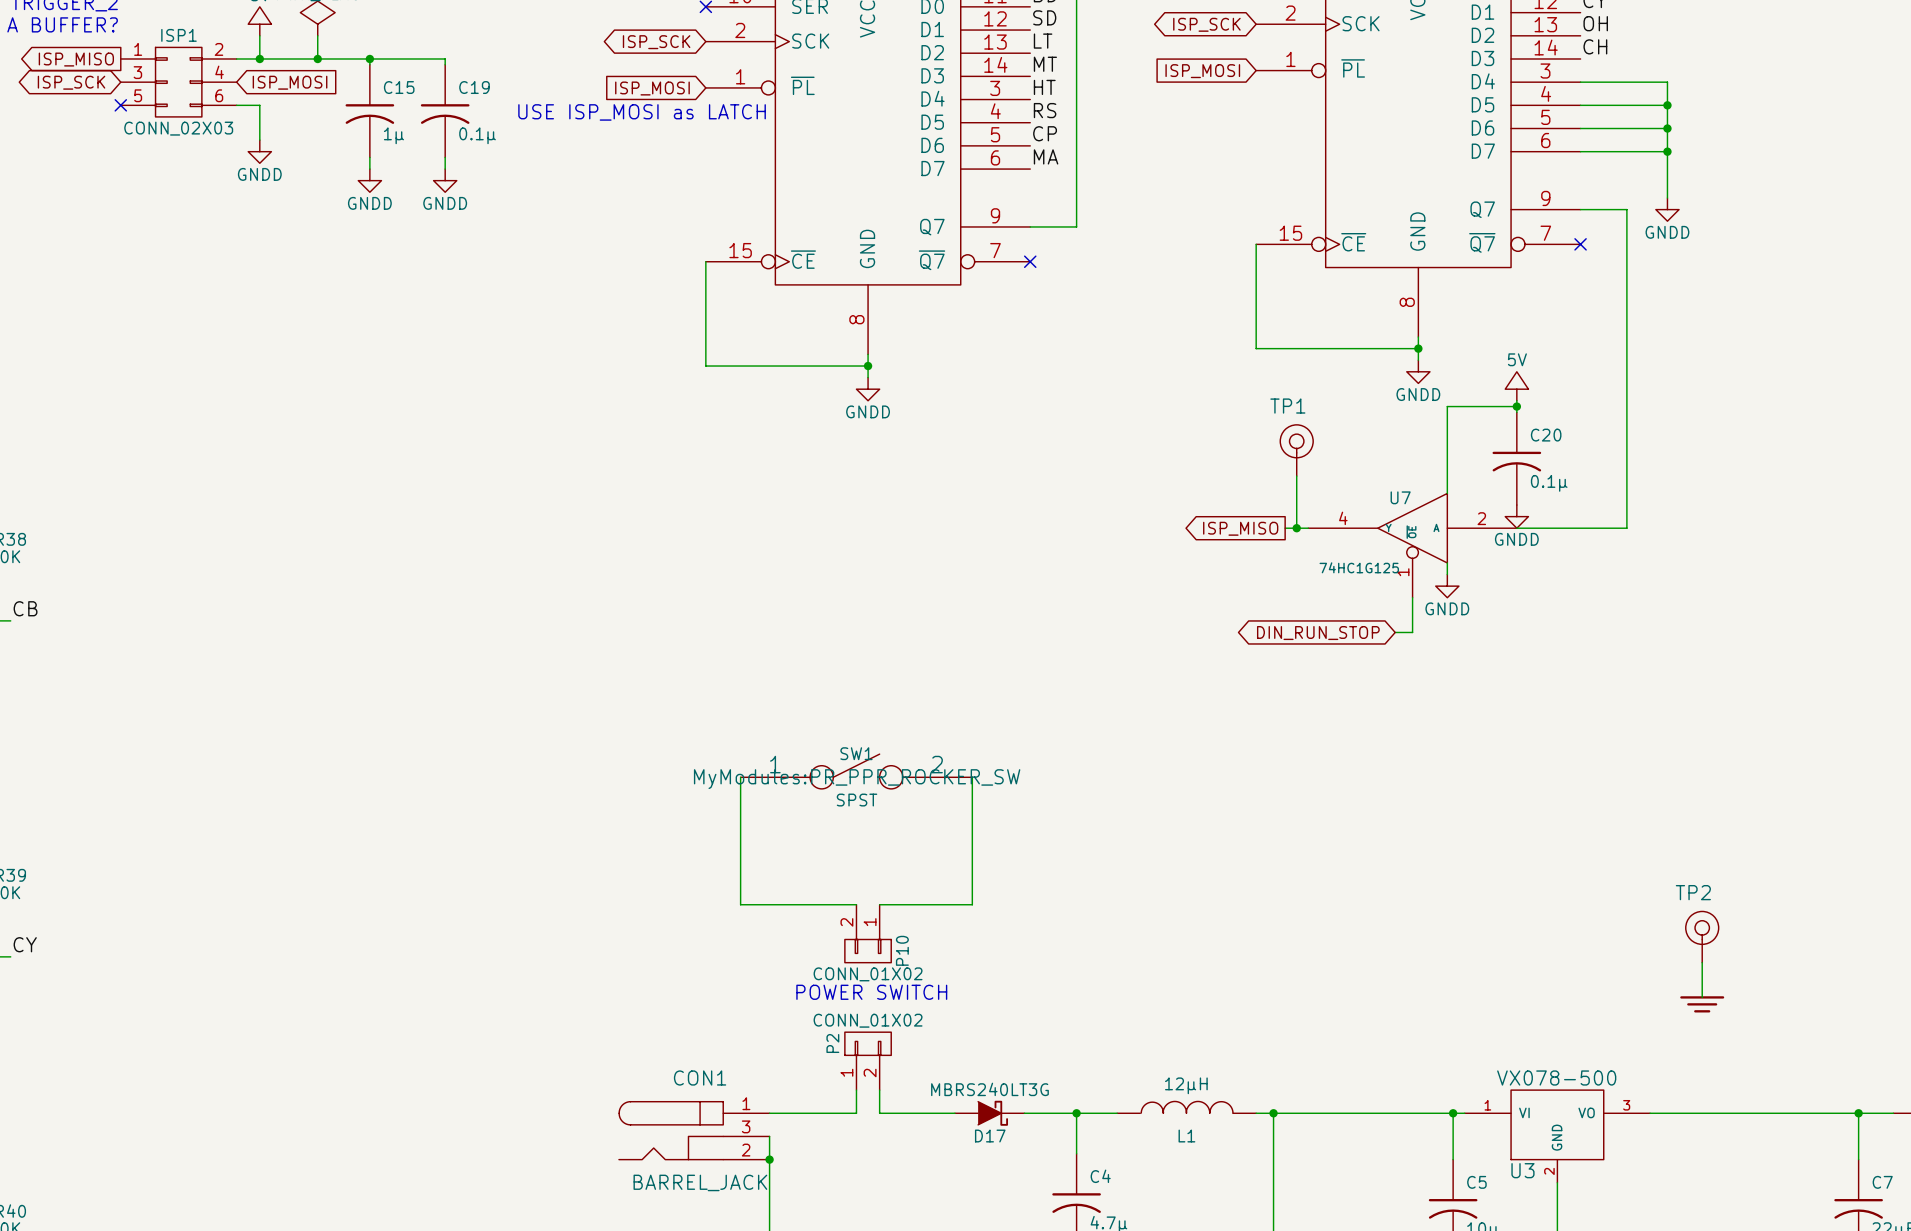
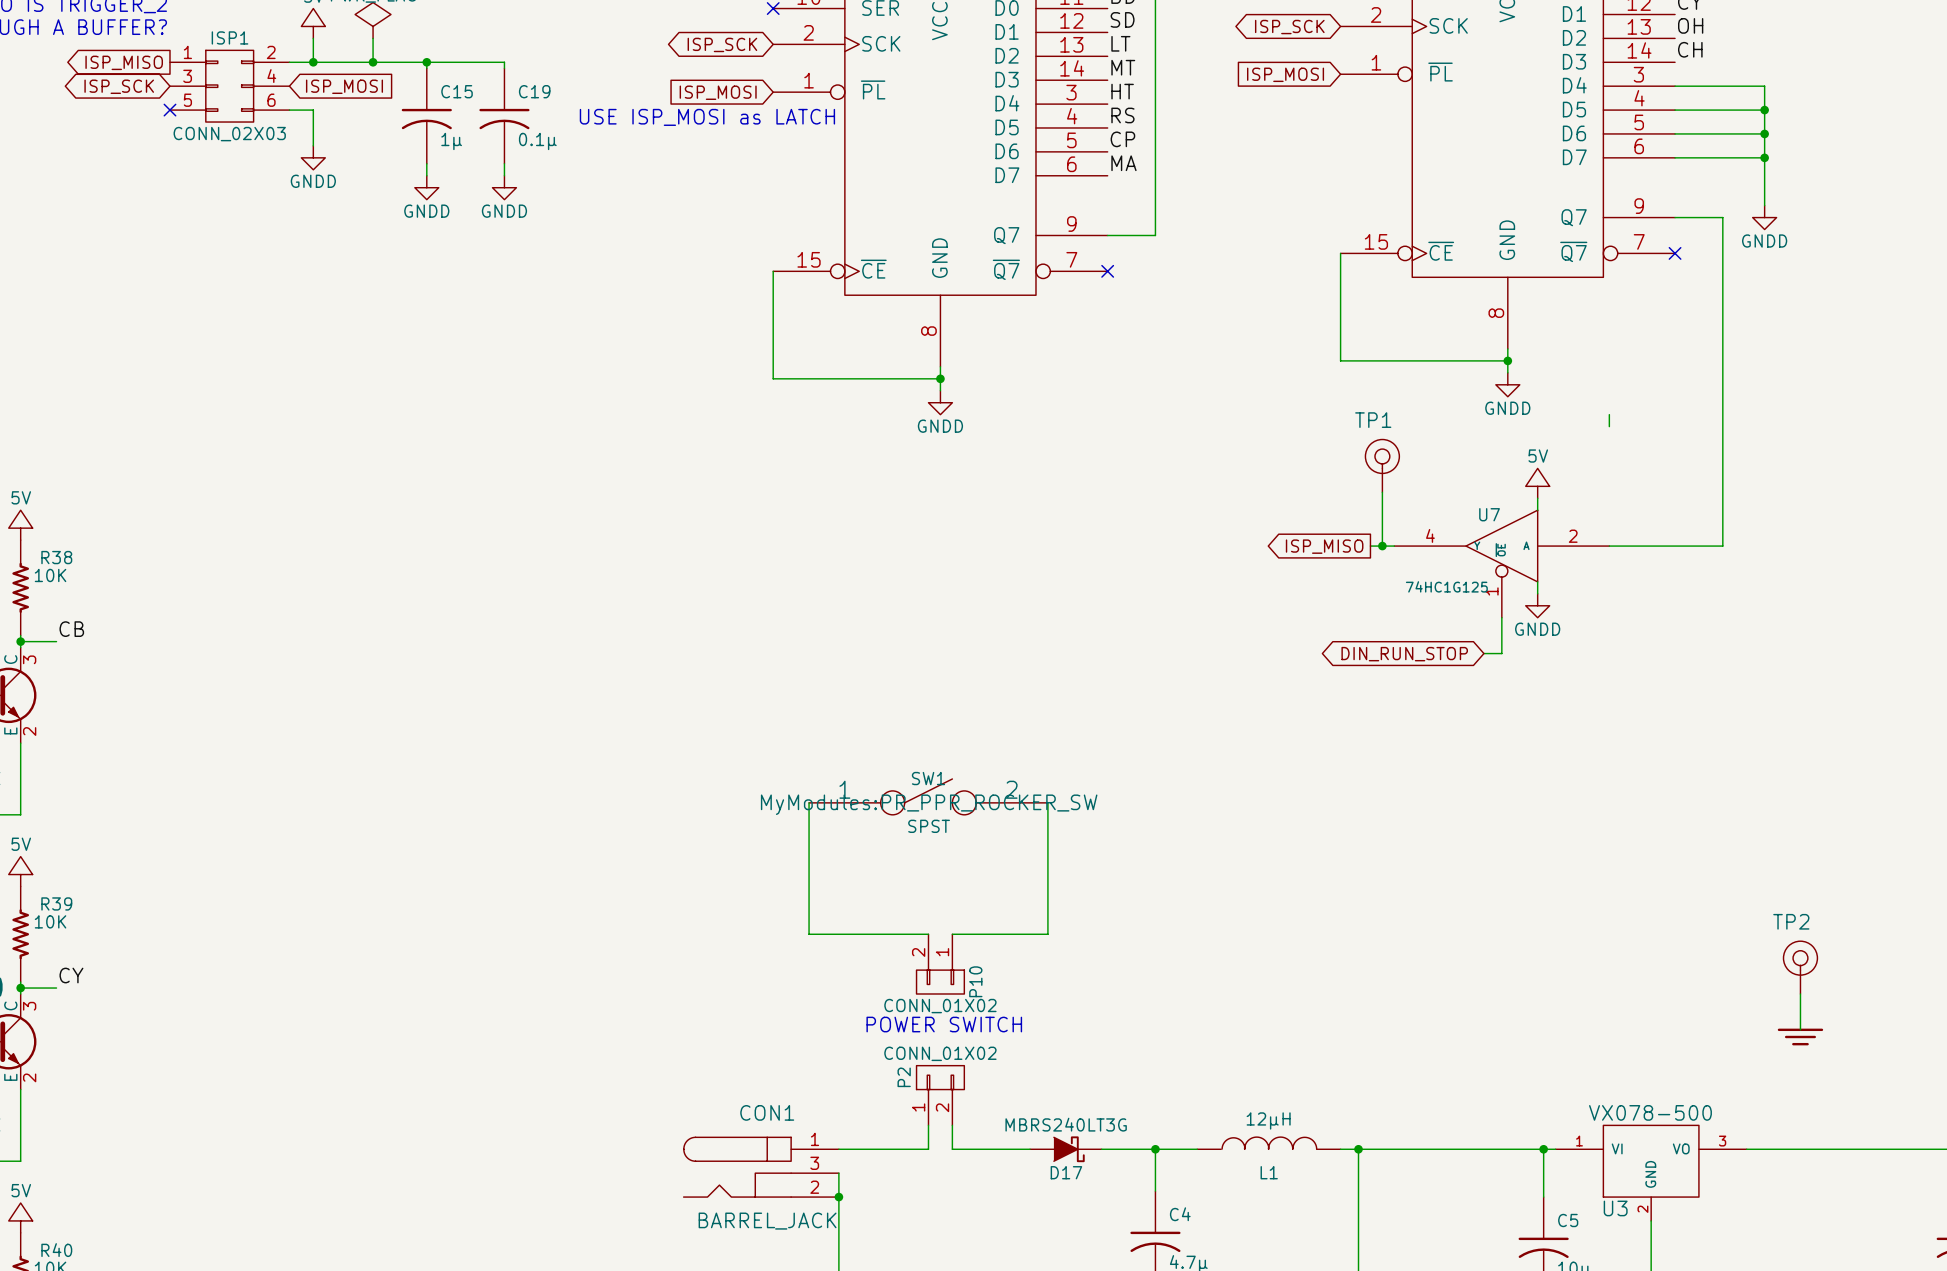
power symbol position: 5V (1516, 386) -> 5V (1537, 483)
wire: (1516, 406) (1447, 406) (1447, 481) -> none
junction: (1516, 406) -> none
C20: 0.1µ (1516, 458) -> none
power symbol: GNDD (1516, 516) -> none

